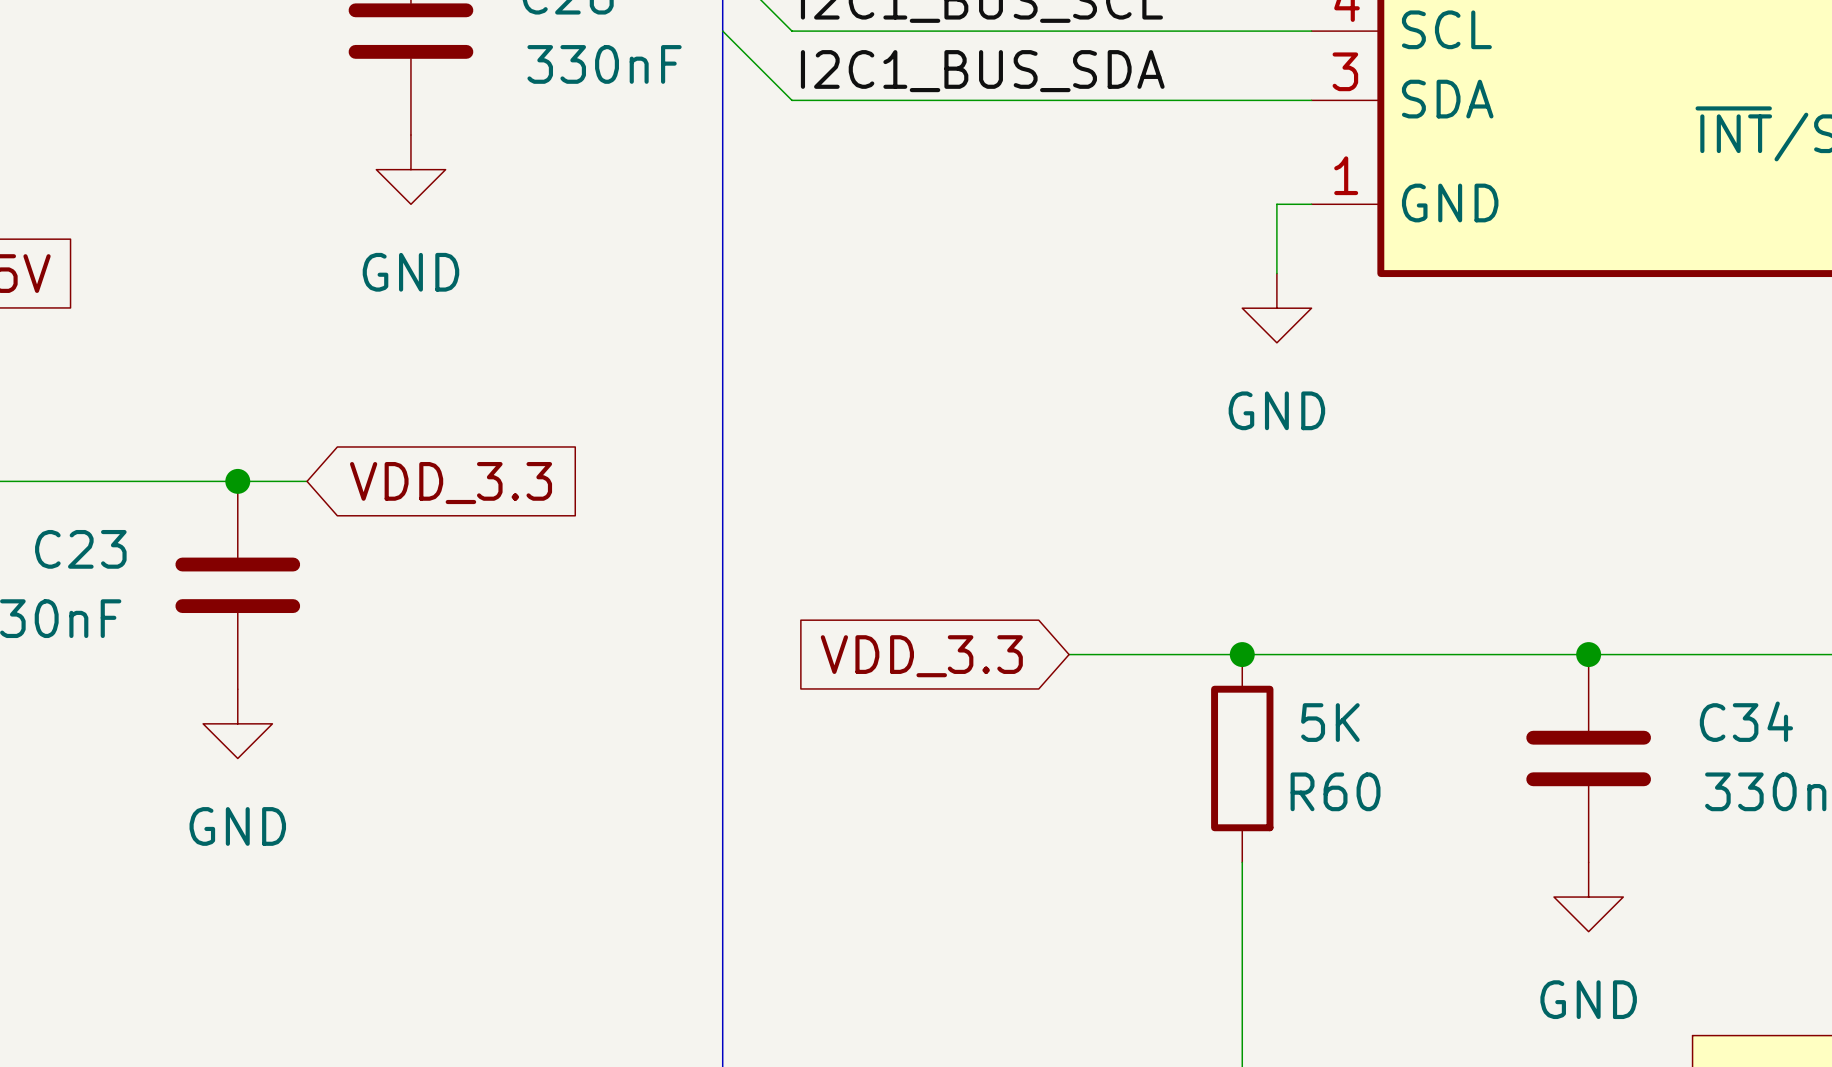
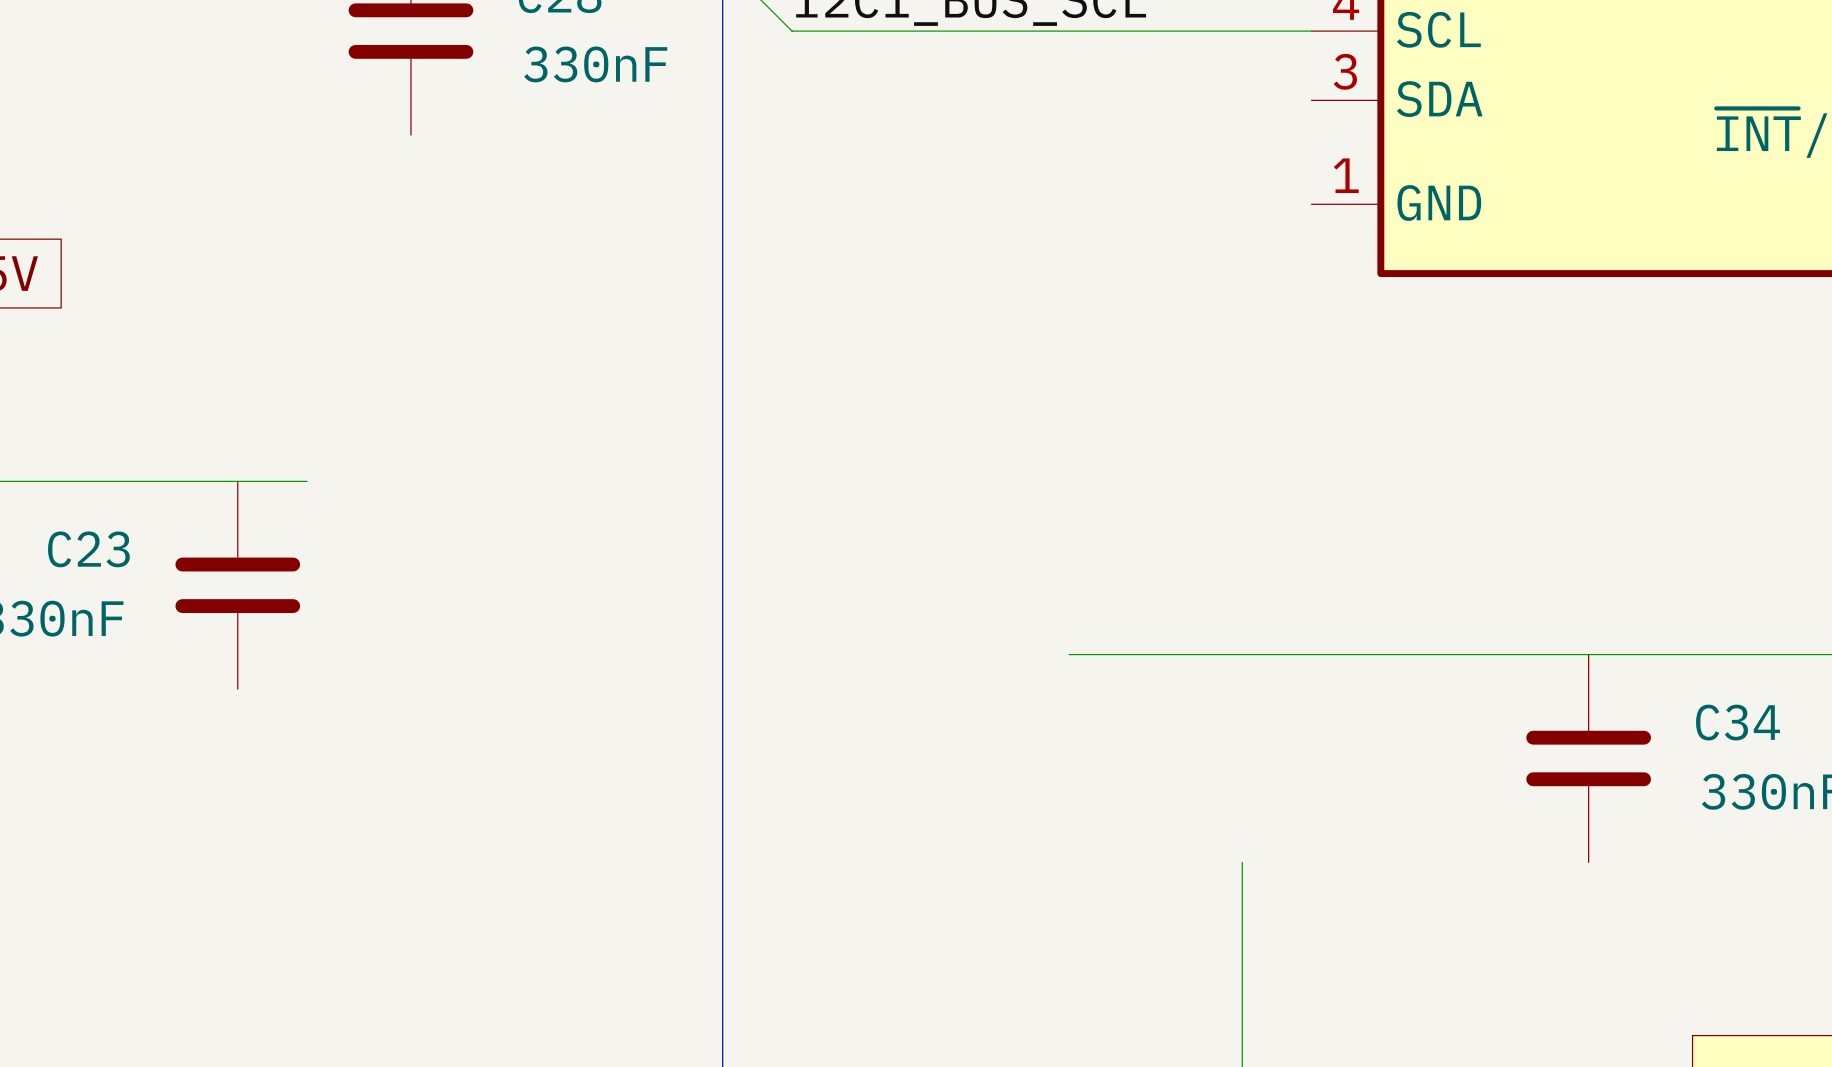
wire: (722, 31) (791, 100) (1311, 100) -> none
label: I2C1_BUS_SDA (982, 71) -> none
power symbol: GND (410, 169) -> none
wire: (1311, 204) (1276, 204) (1276, 273) -> none
power symbol: GND (1276, 308) -> none
junction: (237, 481) -> none
global label: VDD_3.3 (451, 483) -> none
junction: (1242, 654) -> none
junction: (1588, 654) -> none
global label: VDD_3.3 (921, 656) -> none
power symbol: GND (237, 723) -> none
R60: 5K (1242, 758) -> none
power symbol: GND (1588, 897) -> none

